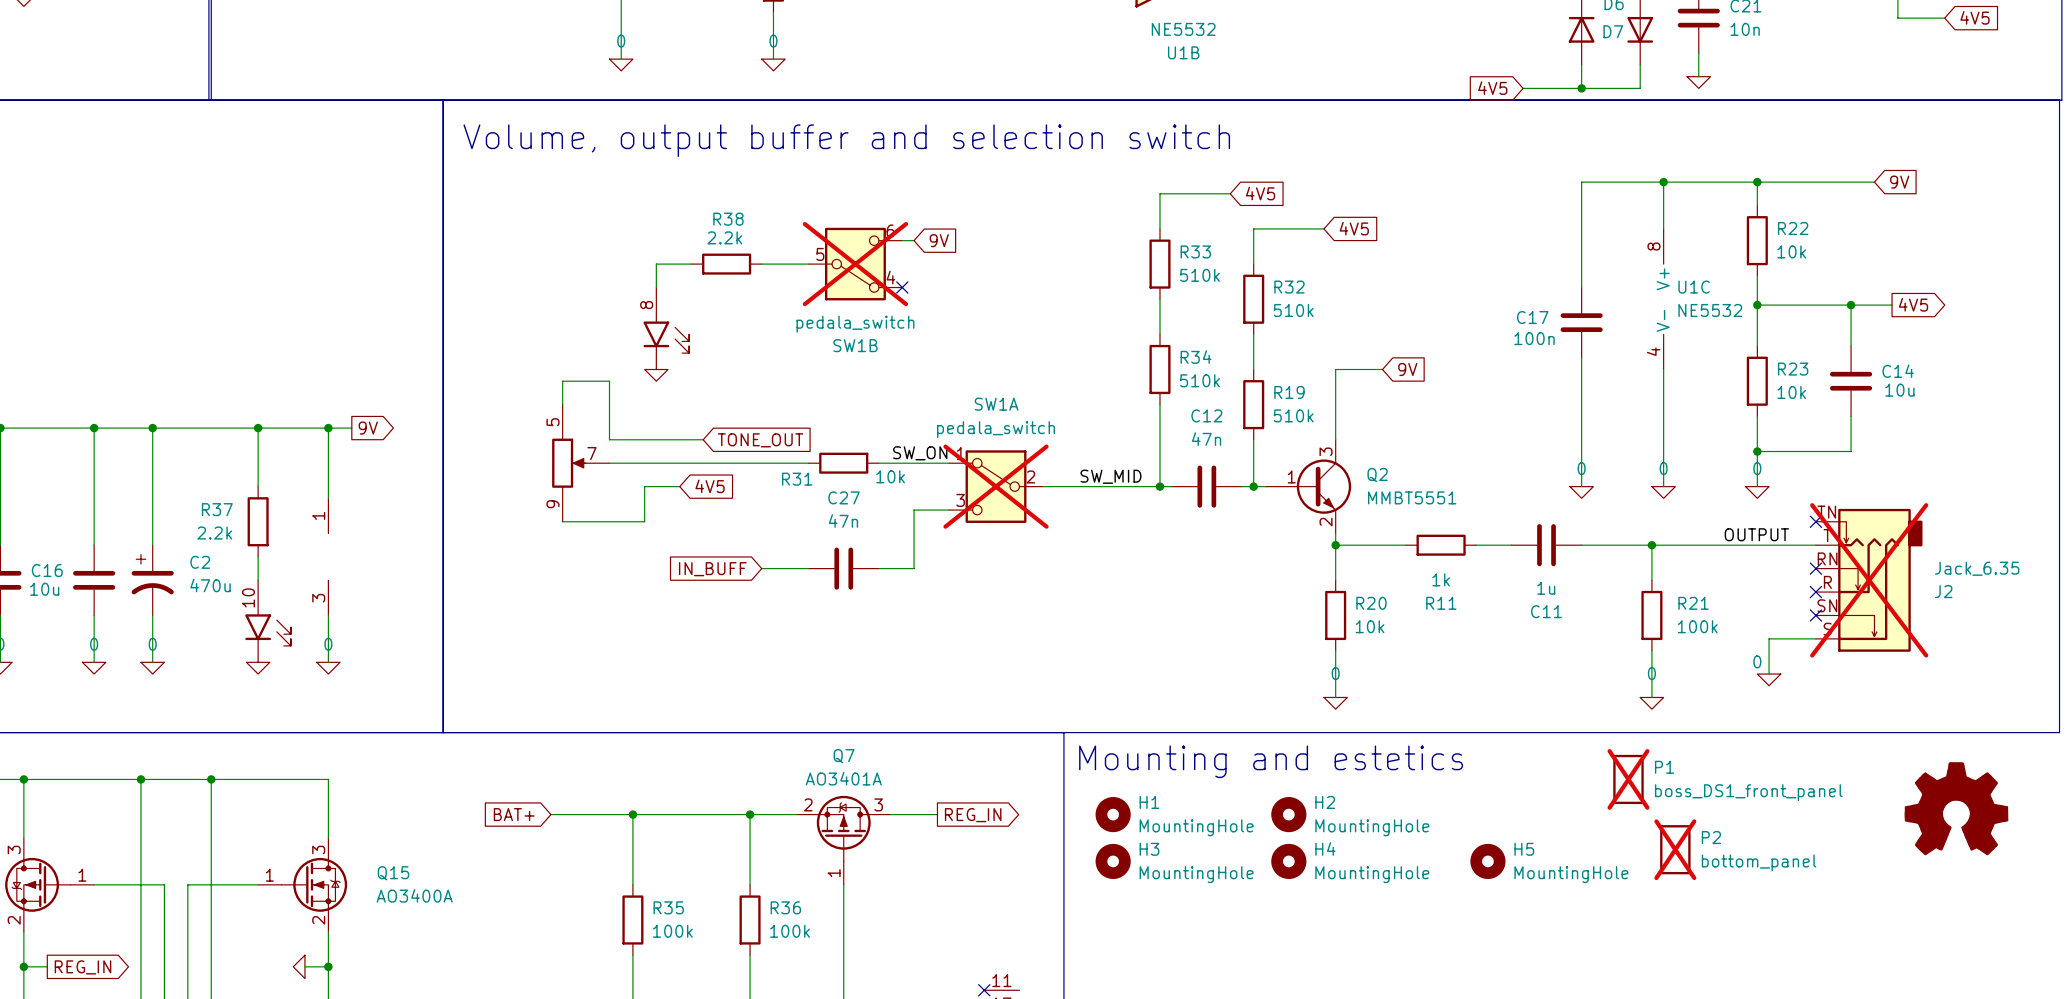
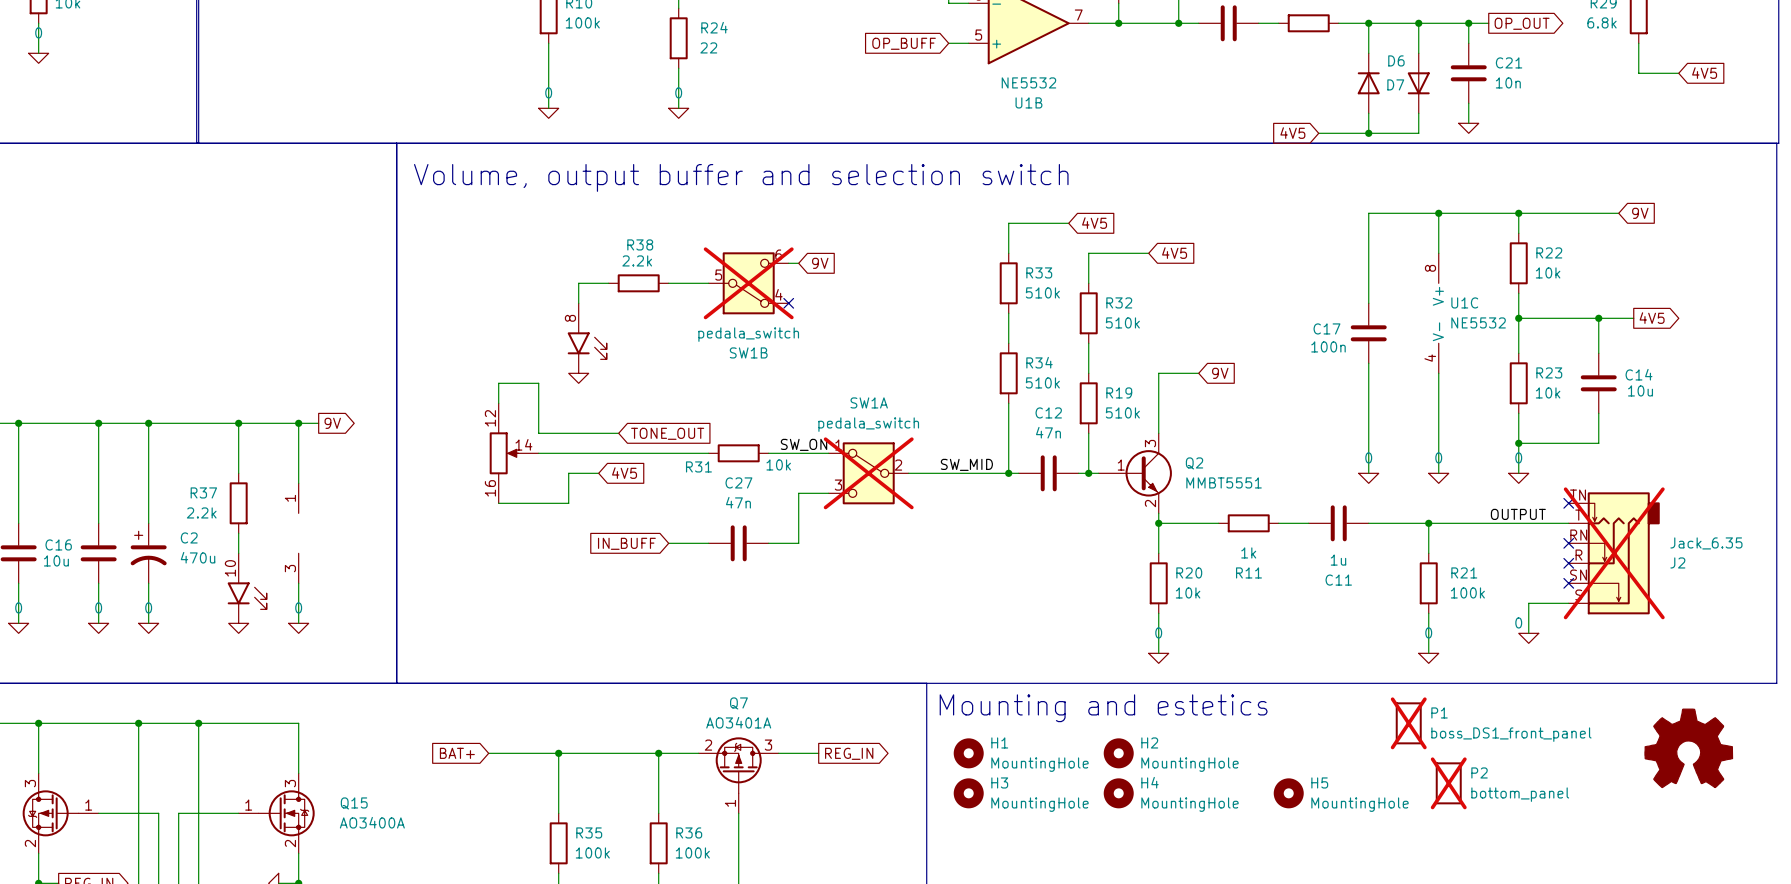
part pin number: 5 (552, 422) -> 12 (490, 418)
part pin number: 7 (591, 453) -> 14 (523, 444)
part pin number: 9 (552, 504) -> 16 (490, 488)

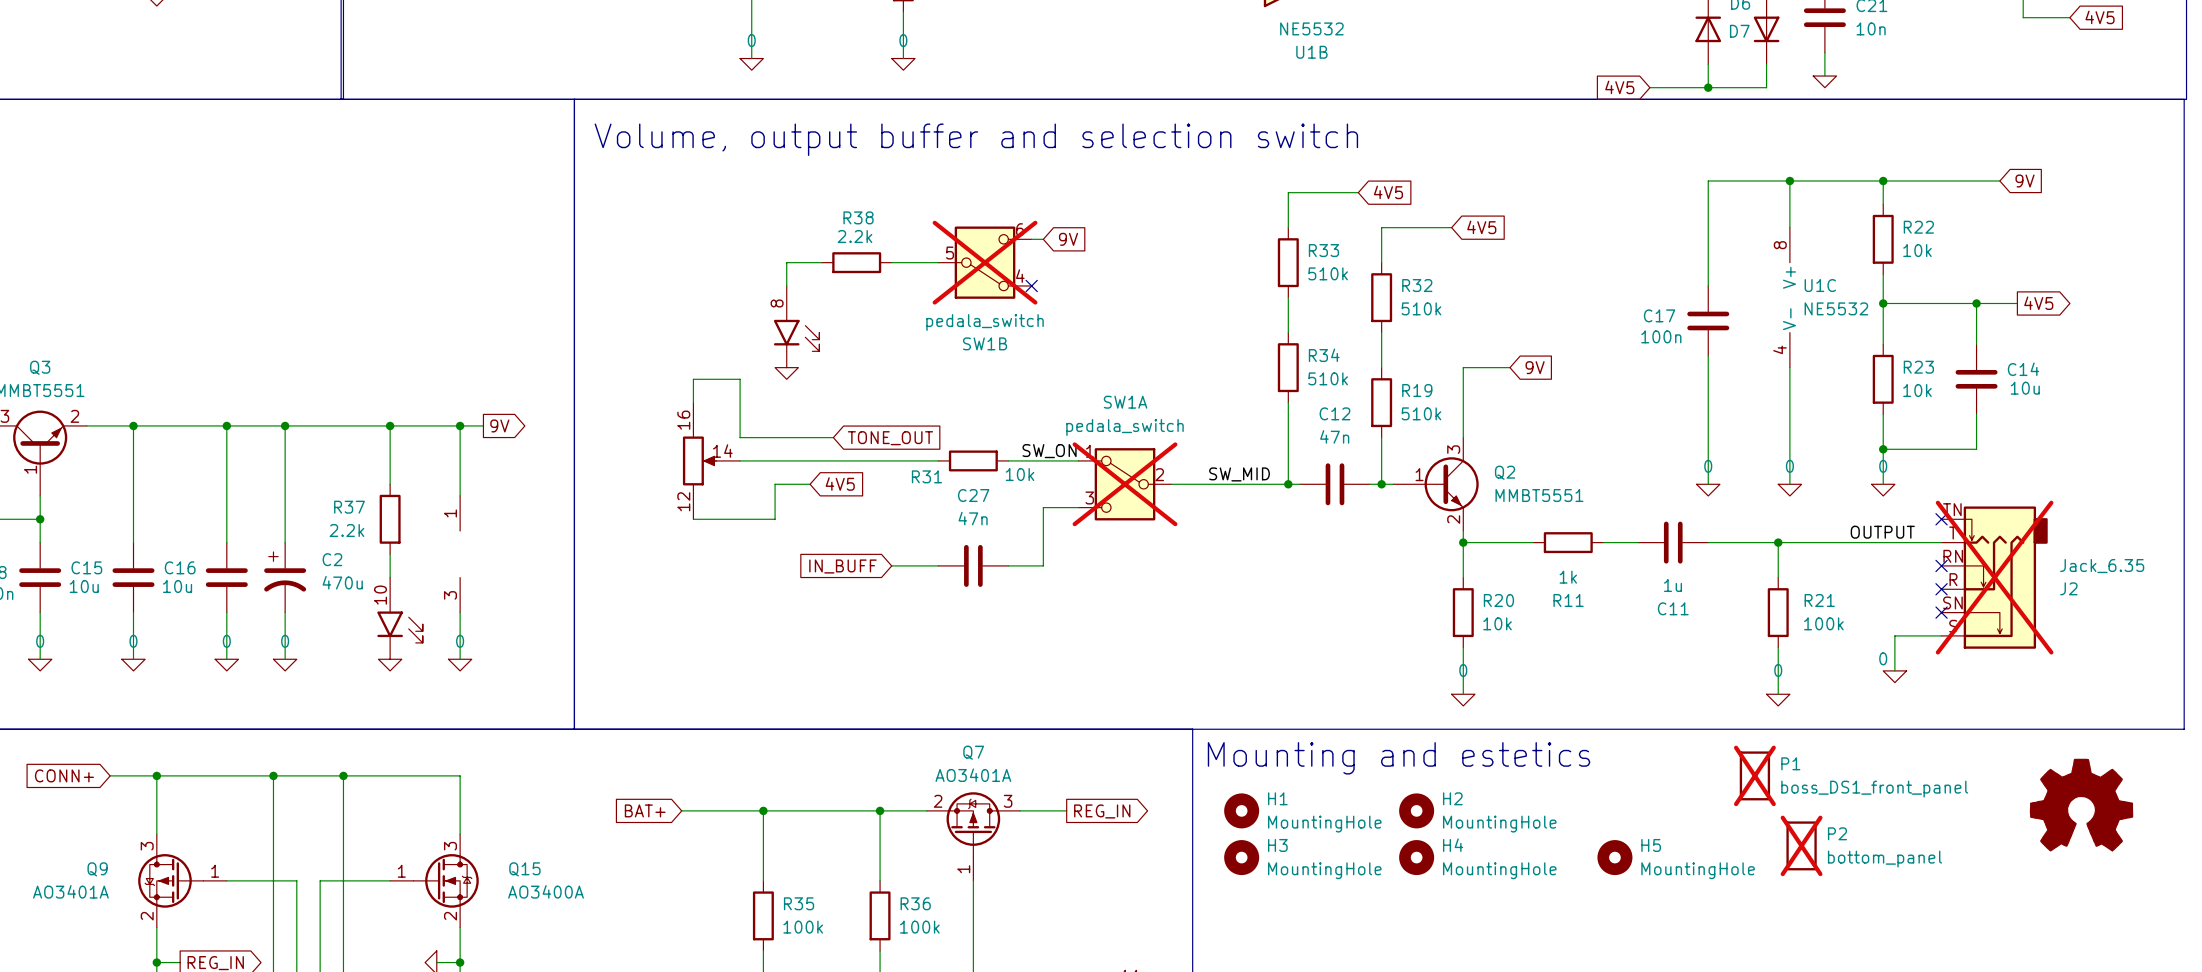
part flip: as is (504, 453) -> up-down (699, 460)

